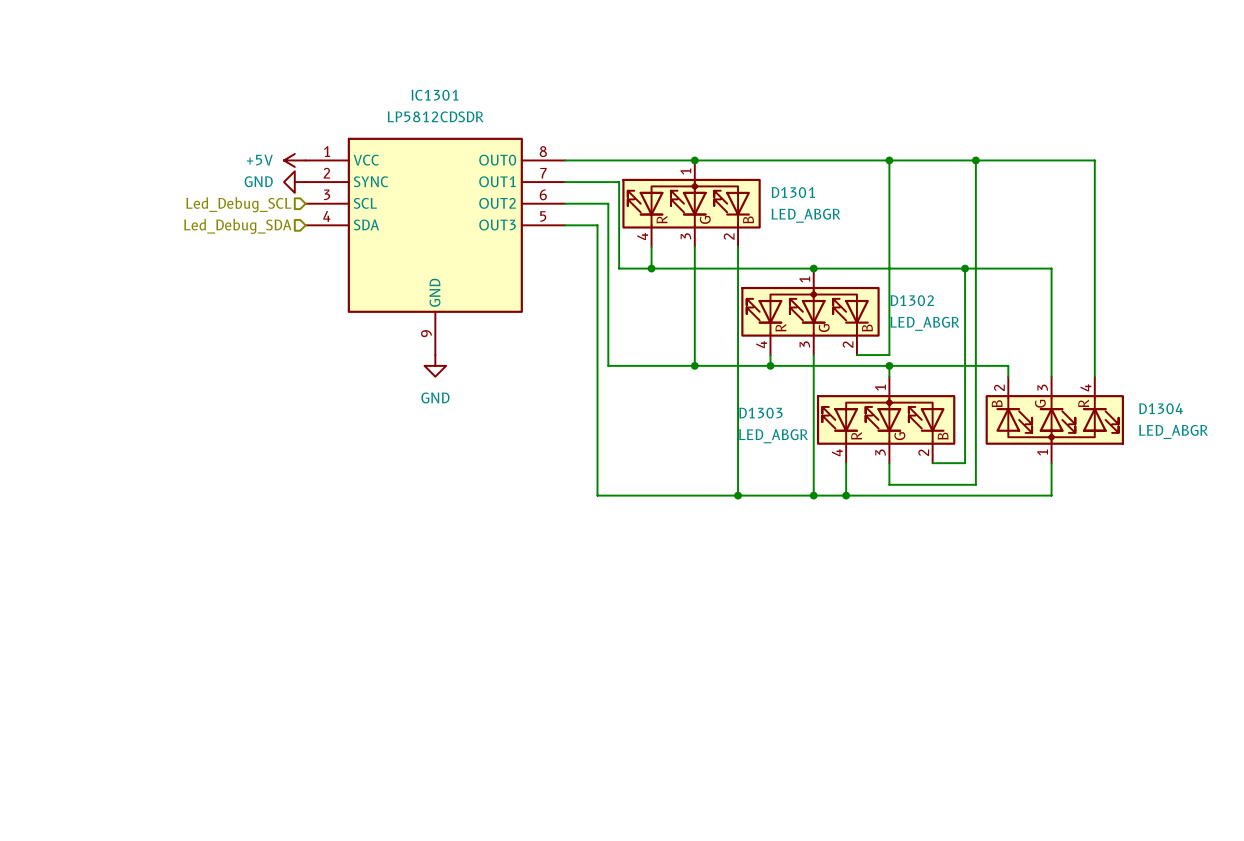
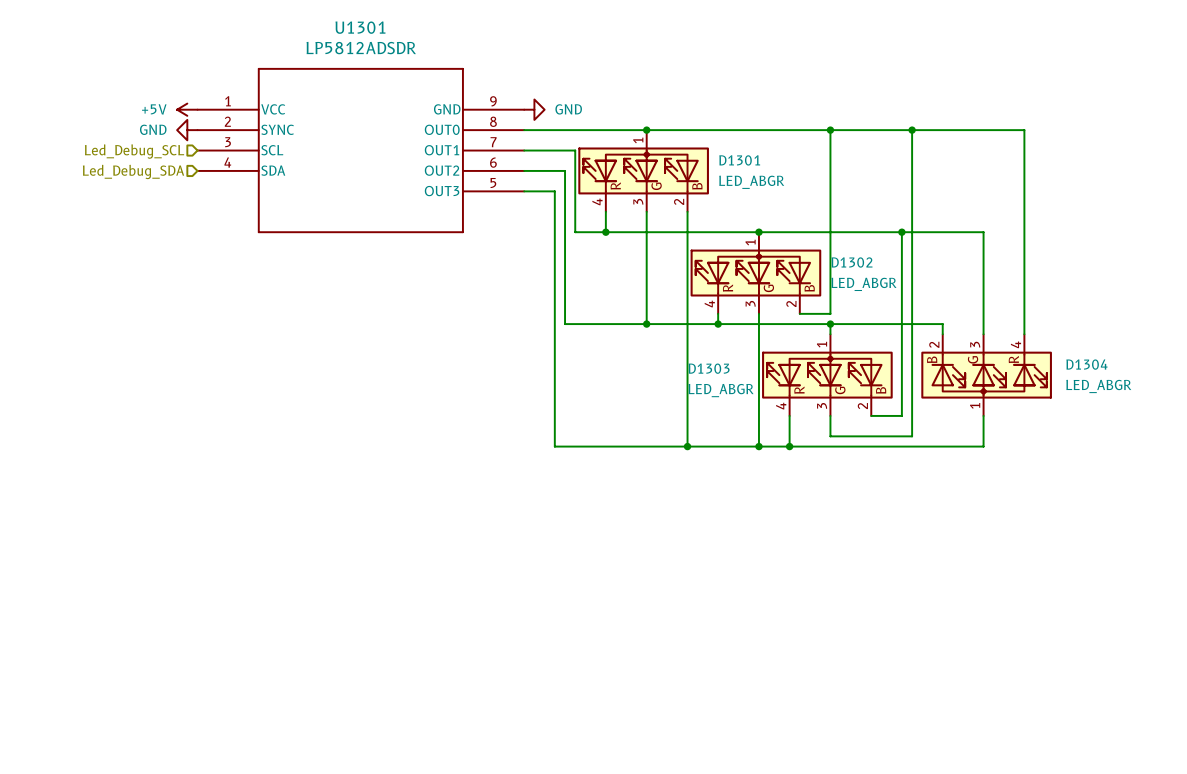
power symbol: none -> GND (534, 109)
power symbol position: +5V (294, 160) -> +5V (187, 109)
power symbol position: GND (294, 182) -> GND (187, 130)
U1301: none -> LP5812ADSDR (360, 150)
hierarchical label position: Led_Debug_SCL (238, 204) -> Led_Debug_SCL (134, 151)
hierarchical label position: Led_Debug_SDA (237, 226) -> Led_Debug_SDA (133, 171)
IC1301: LP5812CDSDR (435, 246) -> none
power symbol: GND (435, 365) -> none

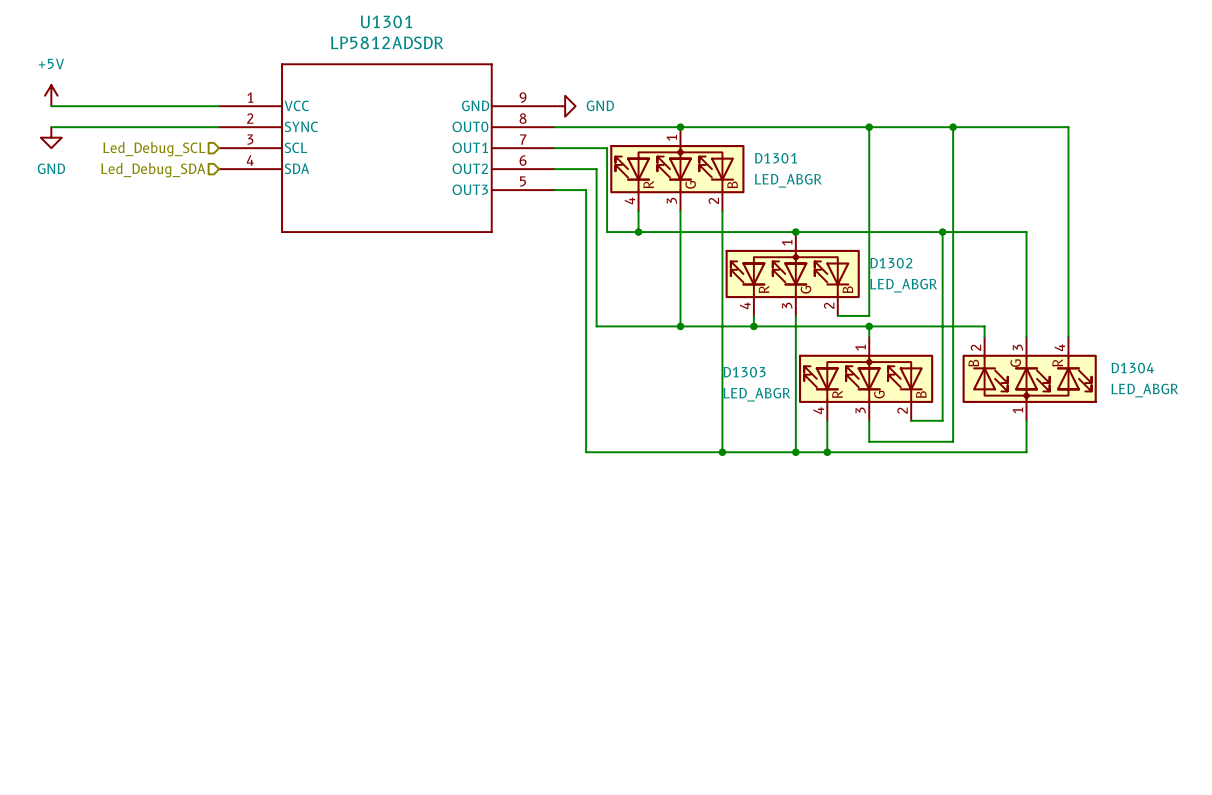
wire: none -> (51, 106) (219, 106)
power symbol rotation: 0° (187, 109) -> 90° clockwise (51, 95)
power symbol position: +5V (187, 109) -> +5V (51, 95)
wire: none -> (51, 127) (219, 127)
power symbol rotation: 0° (187, 130) -> 90° counterclockwise (51, 137)
power symbol position: GND (187, 130) -> GND (51, 137)

